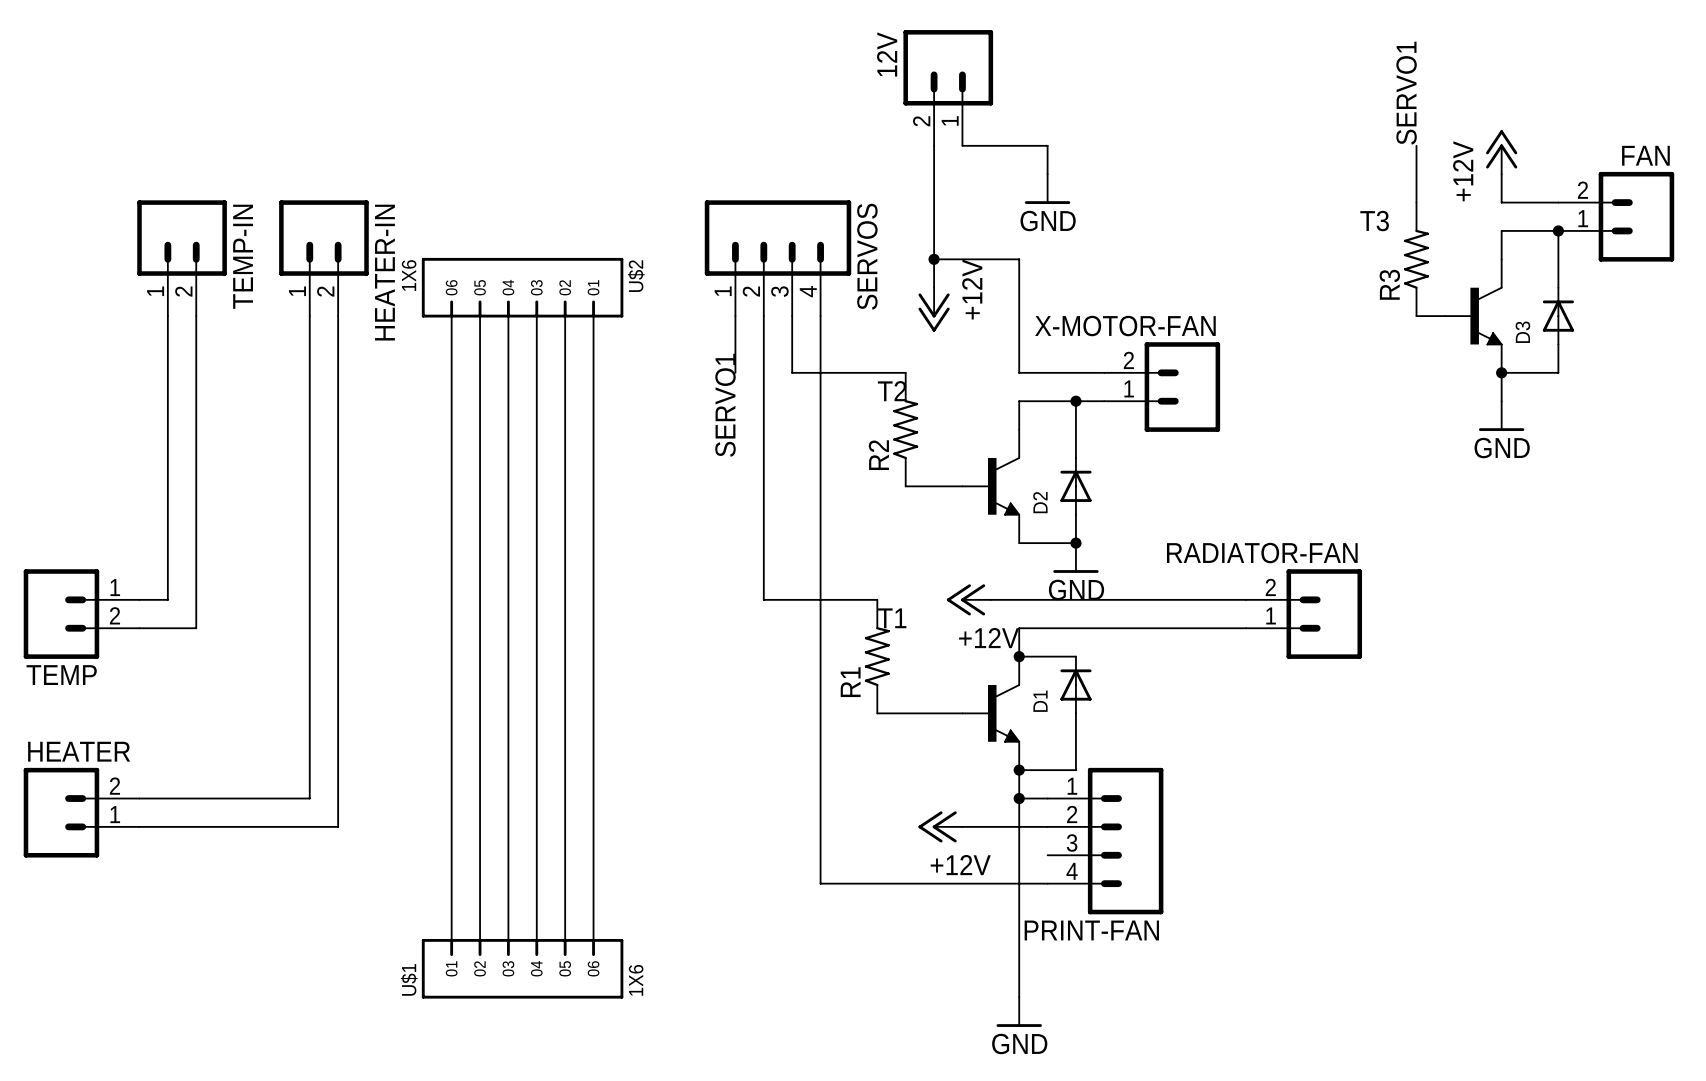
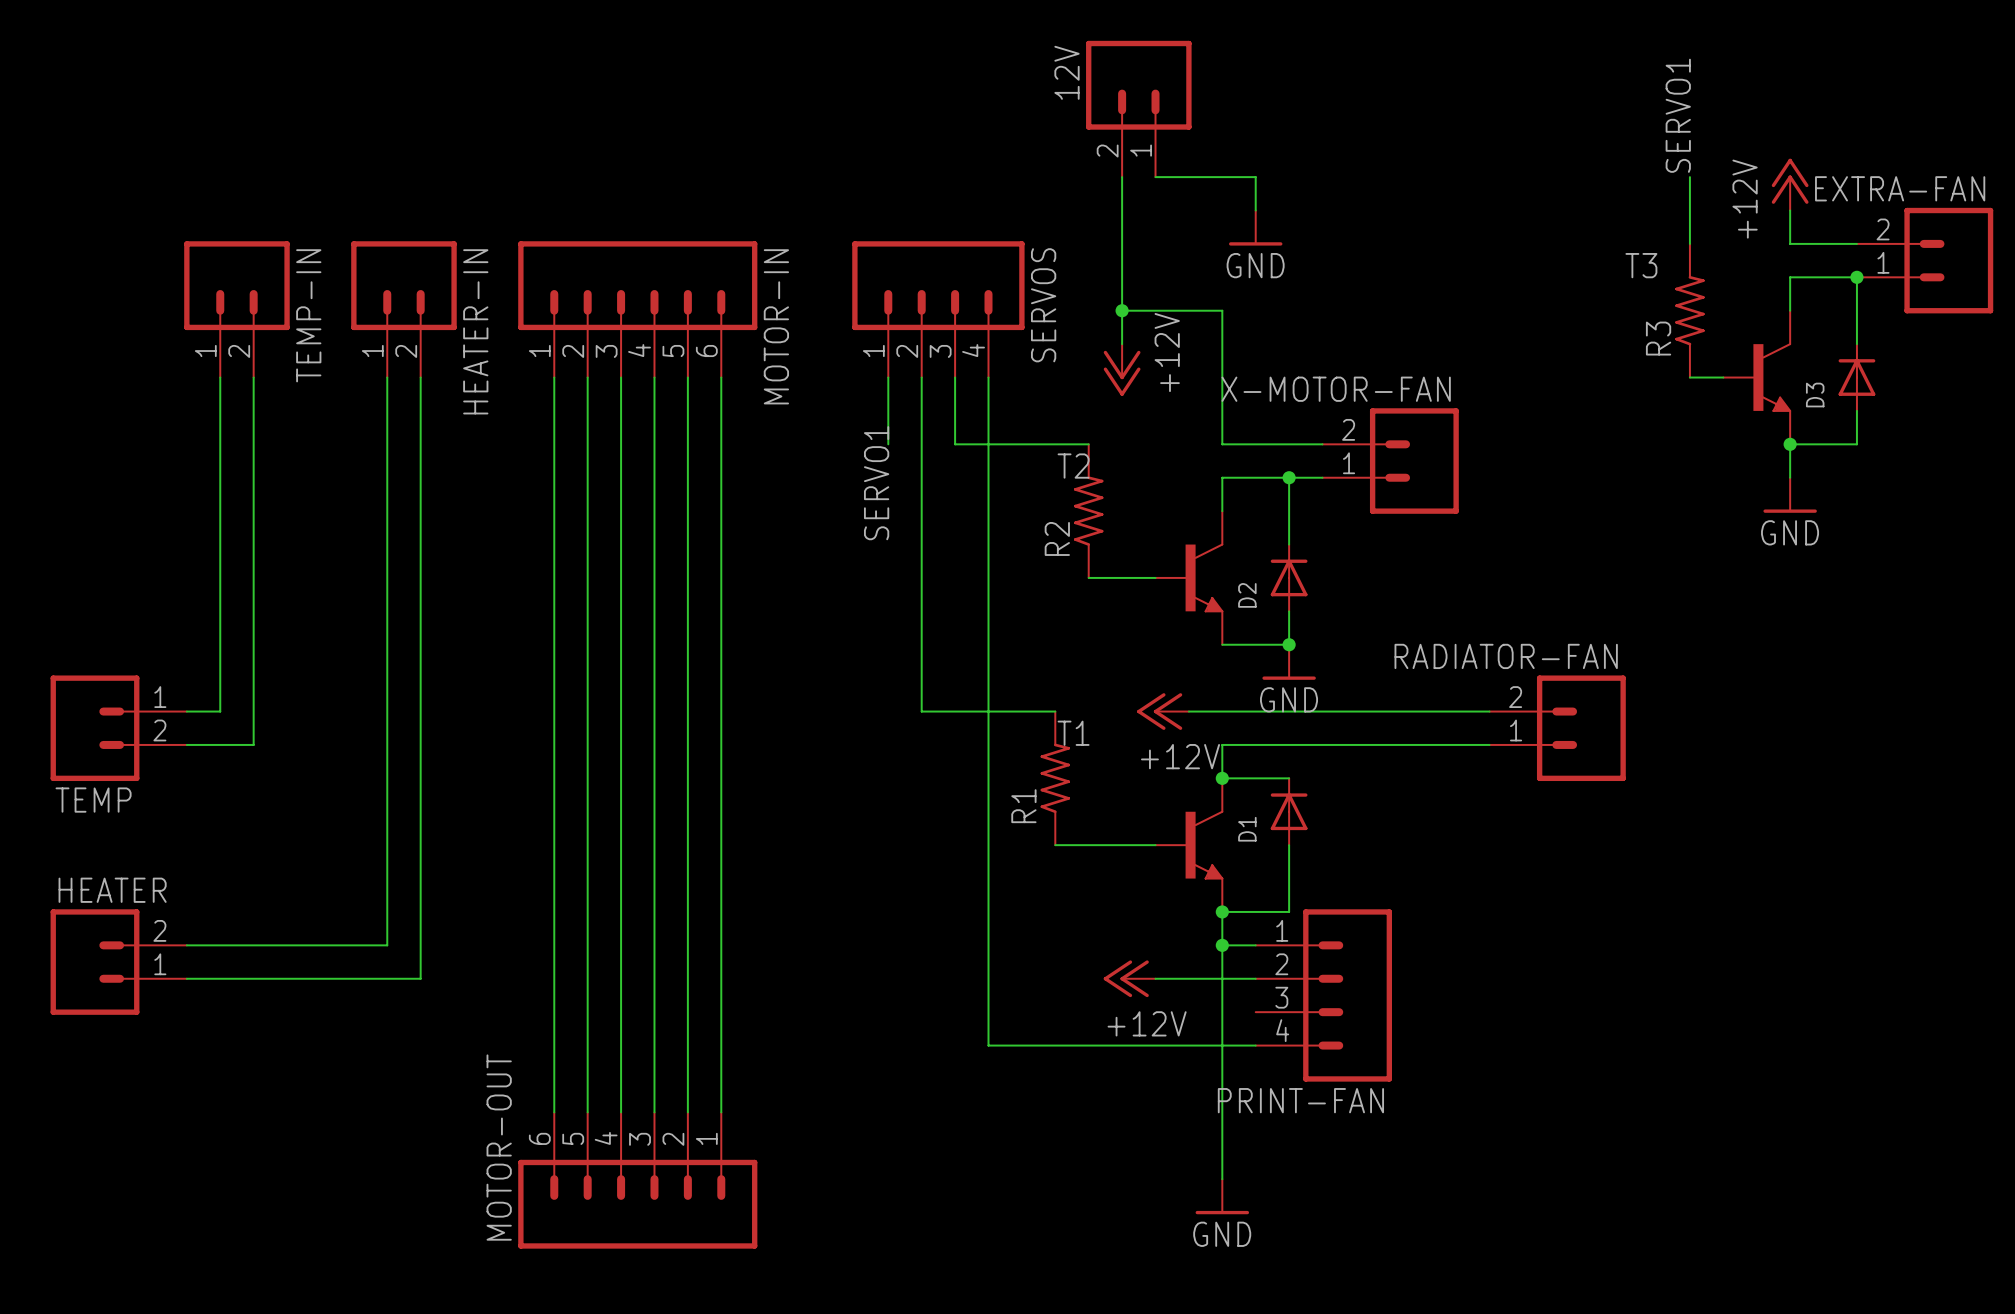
FAN name: FAN (1645, 155) -> EXTRA-FAN (1900, 188)
MOTOR-IN: none -> (637, 309)
U$2: 1X6 (522, 287) -> none
U$1: 1X6 (522, 968) -> none
MOTOR-OUT: none -> (637, 1180)

